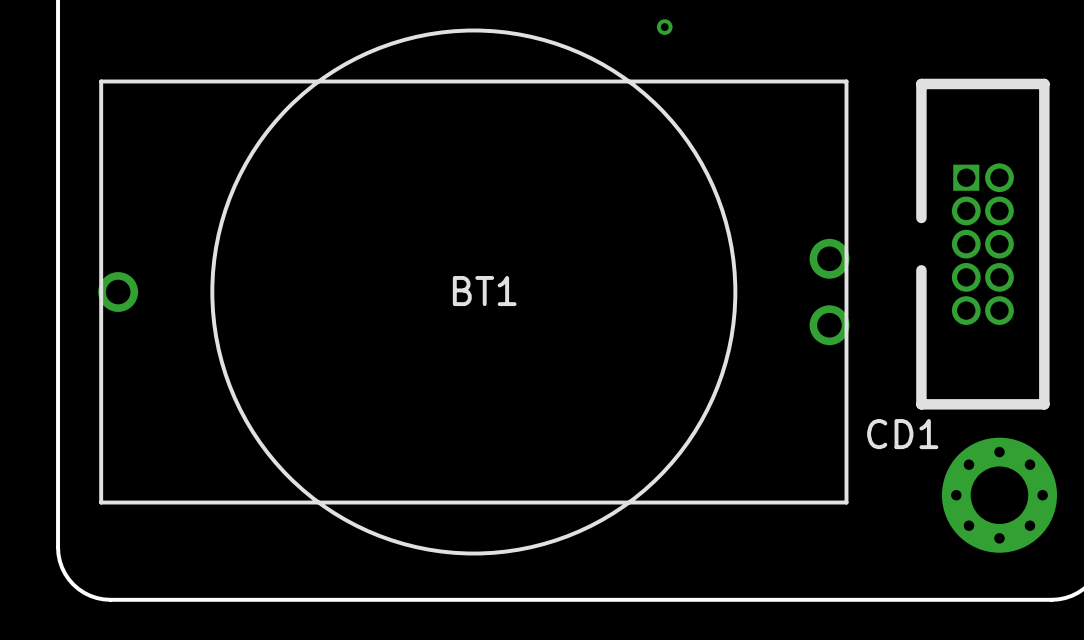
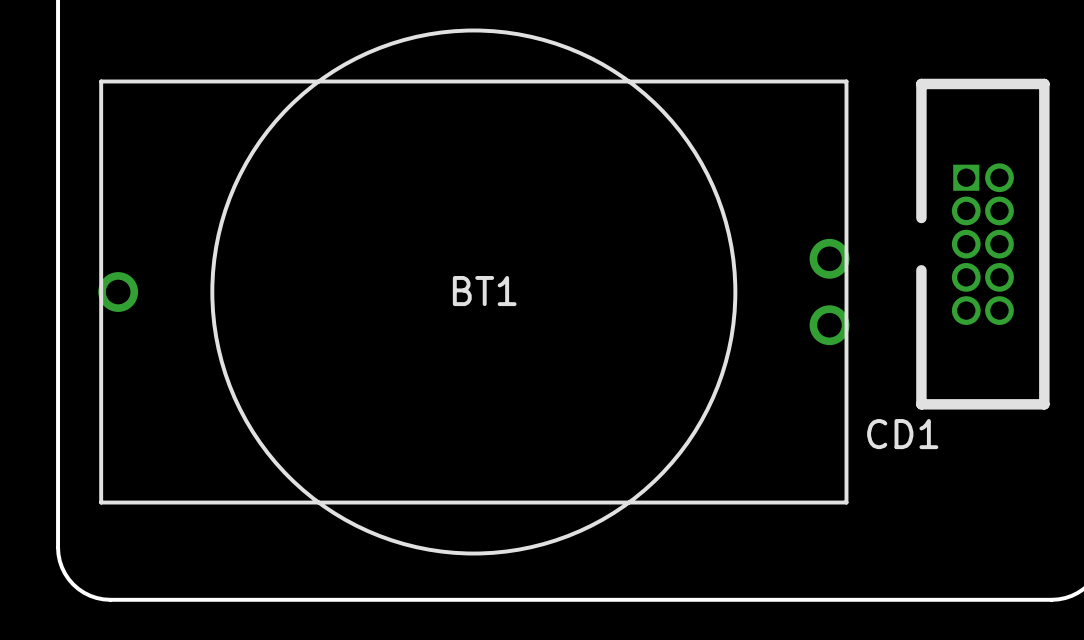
part: (664, 27) -> none
part: (999, 495) -> none

